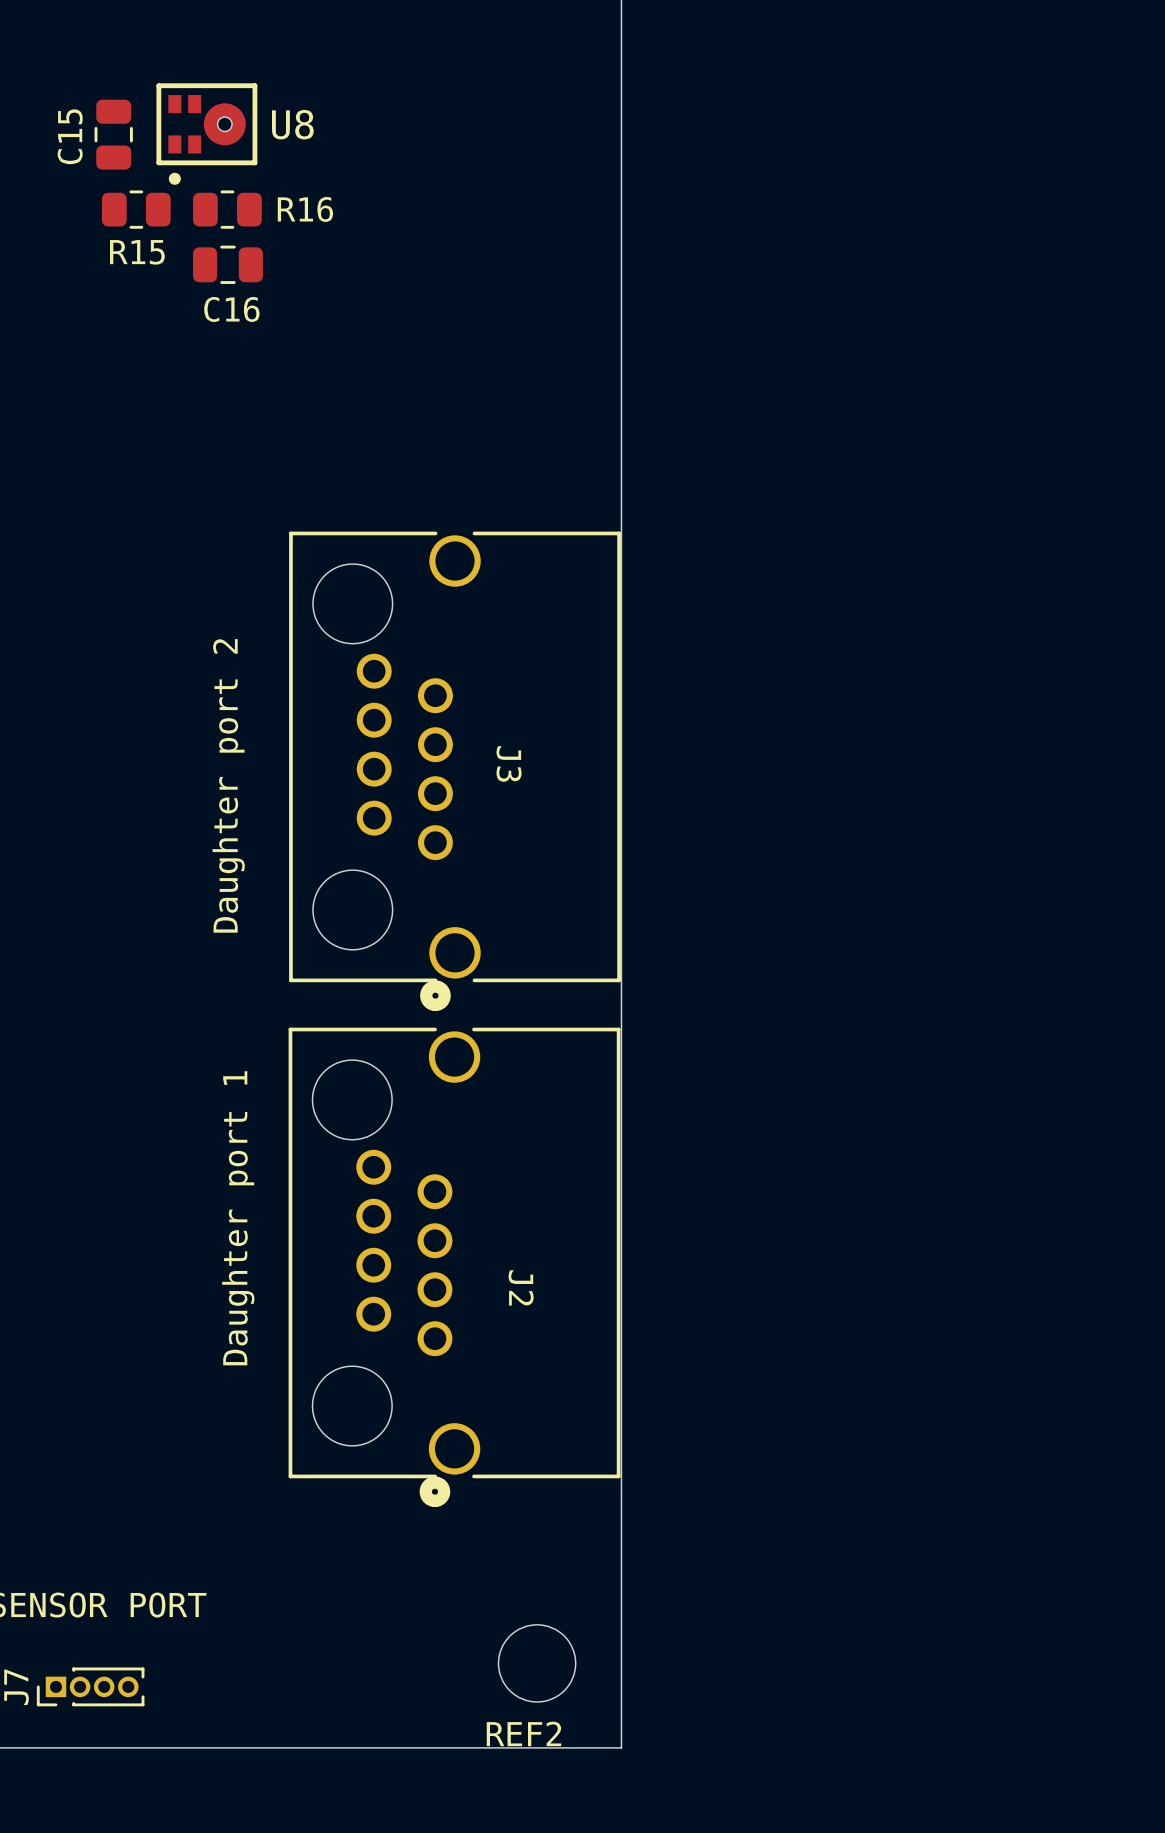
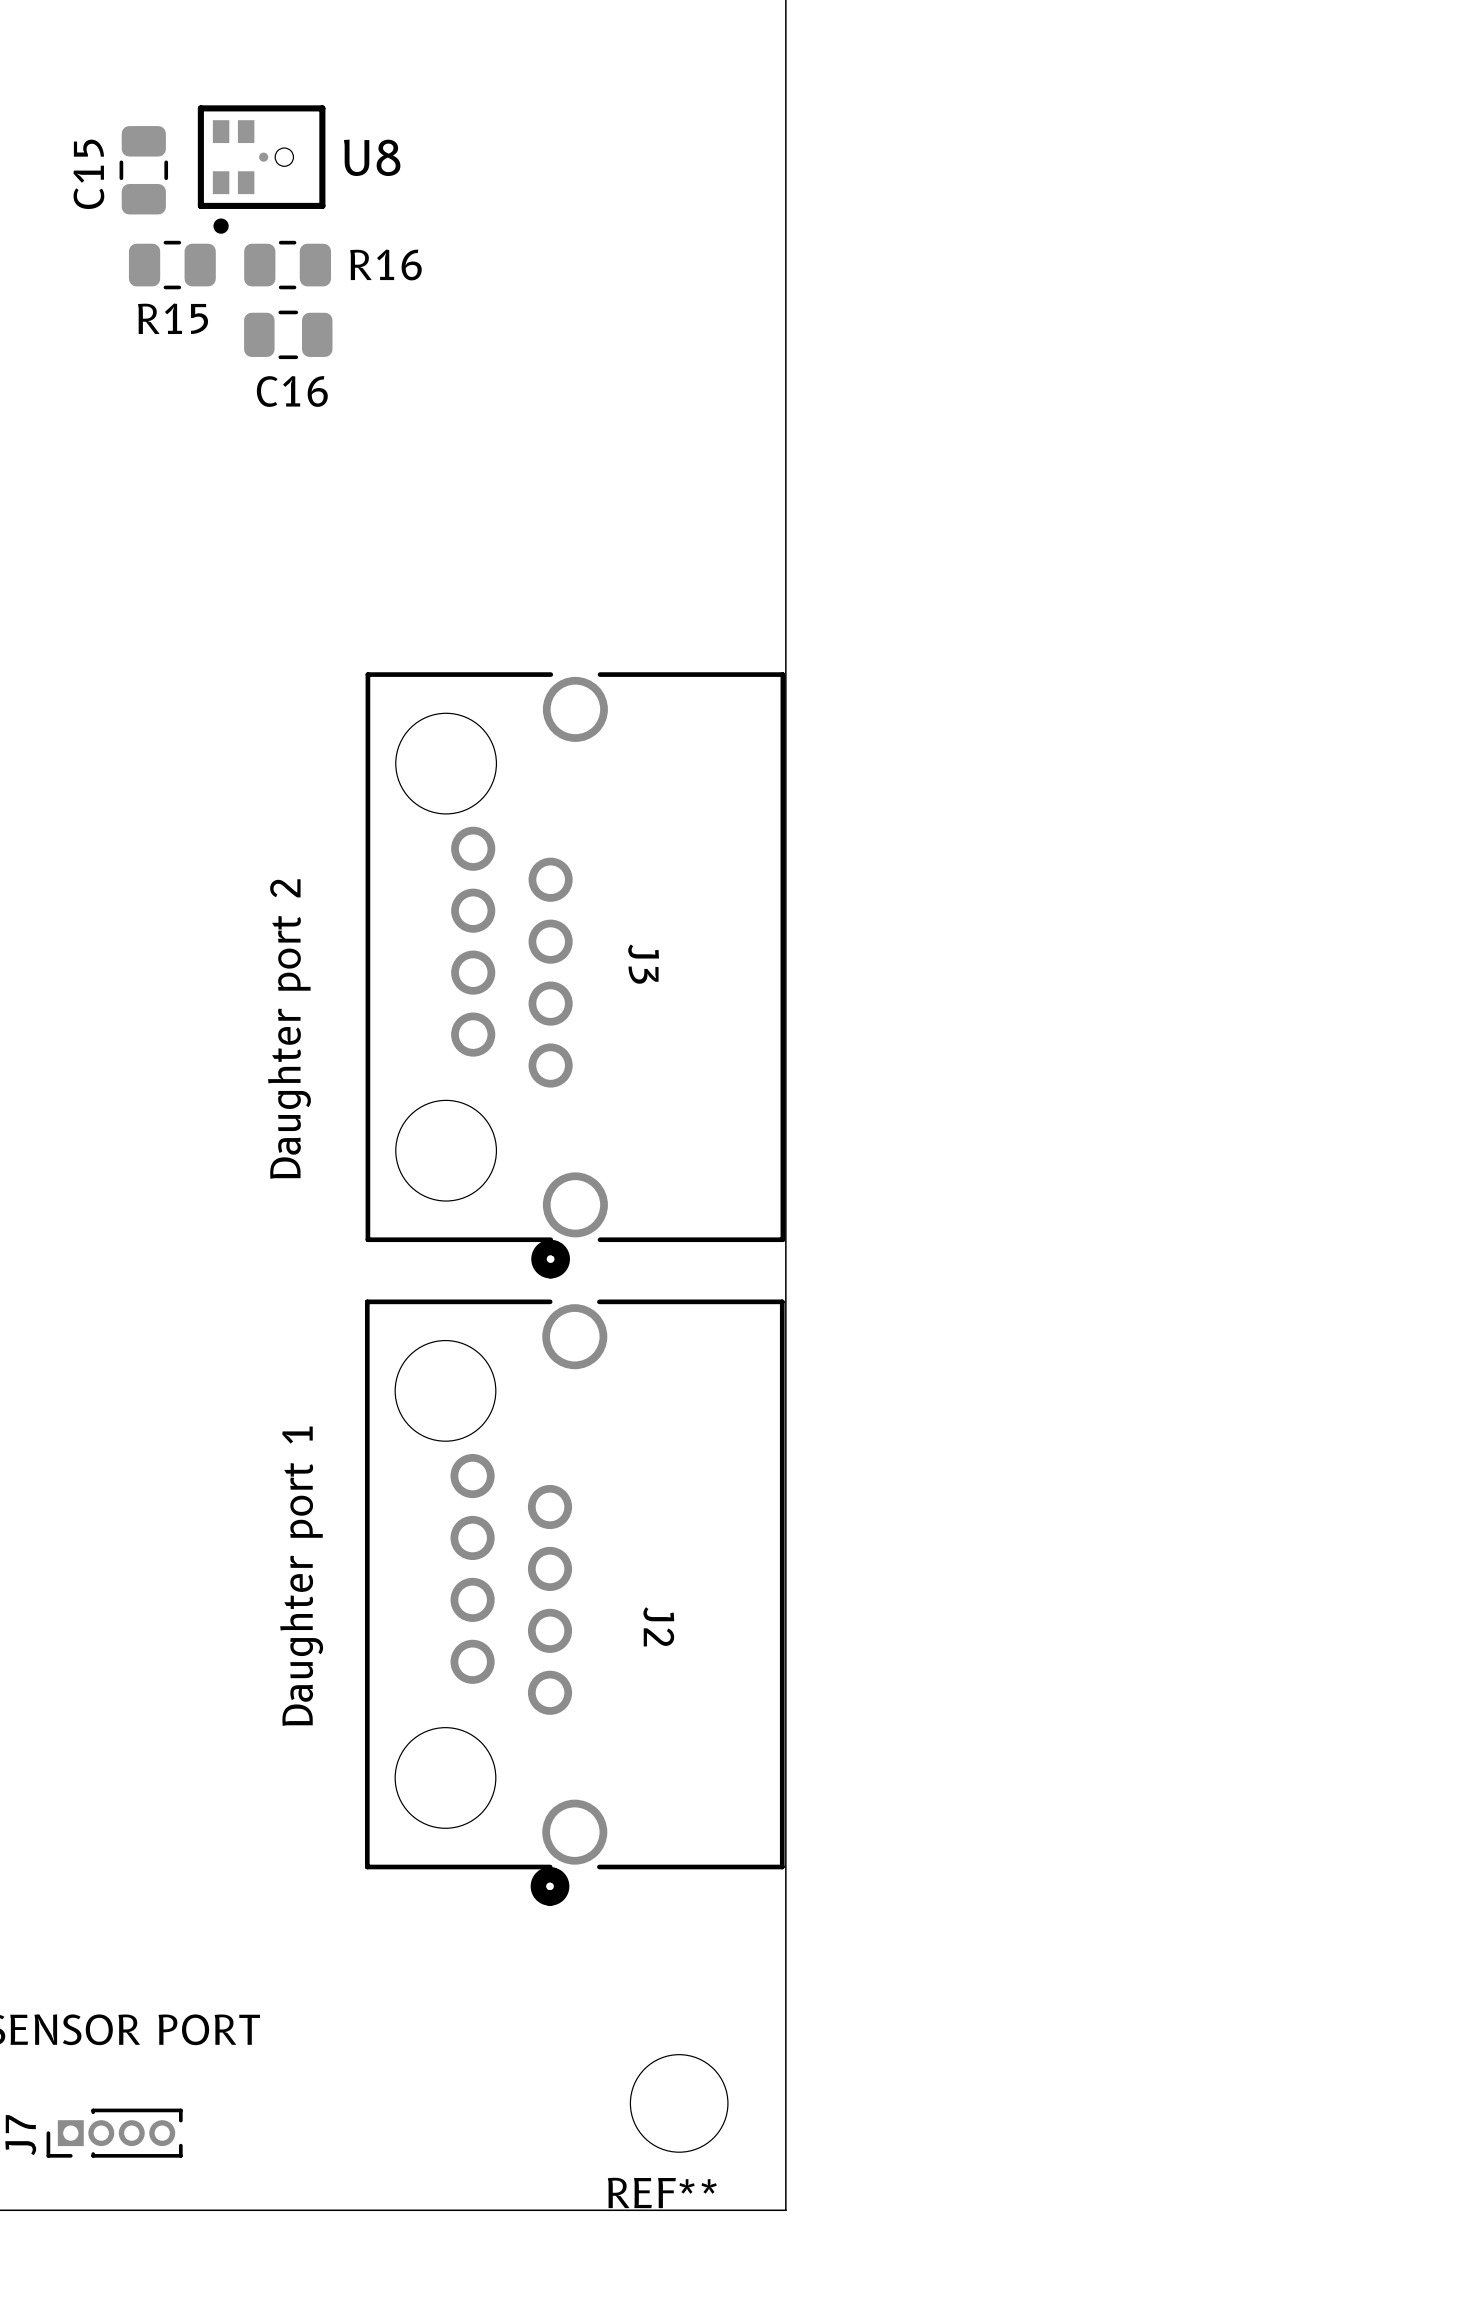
U8 footprint: [156, 83, 258, 185] -> [197, 105, 326, 234]
REF2 name: REF2 (523, 1733) -> REF** (662, 2192)

